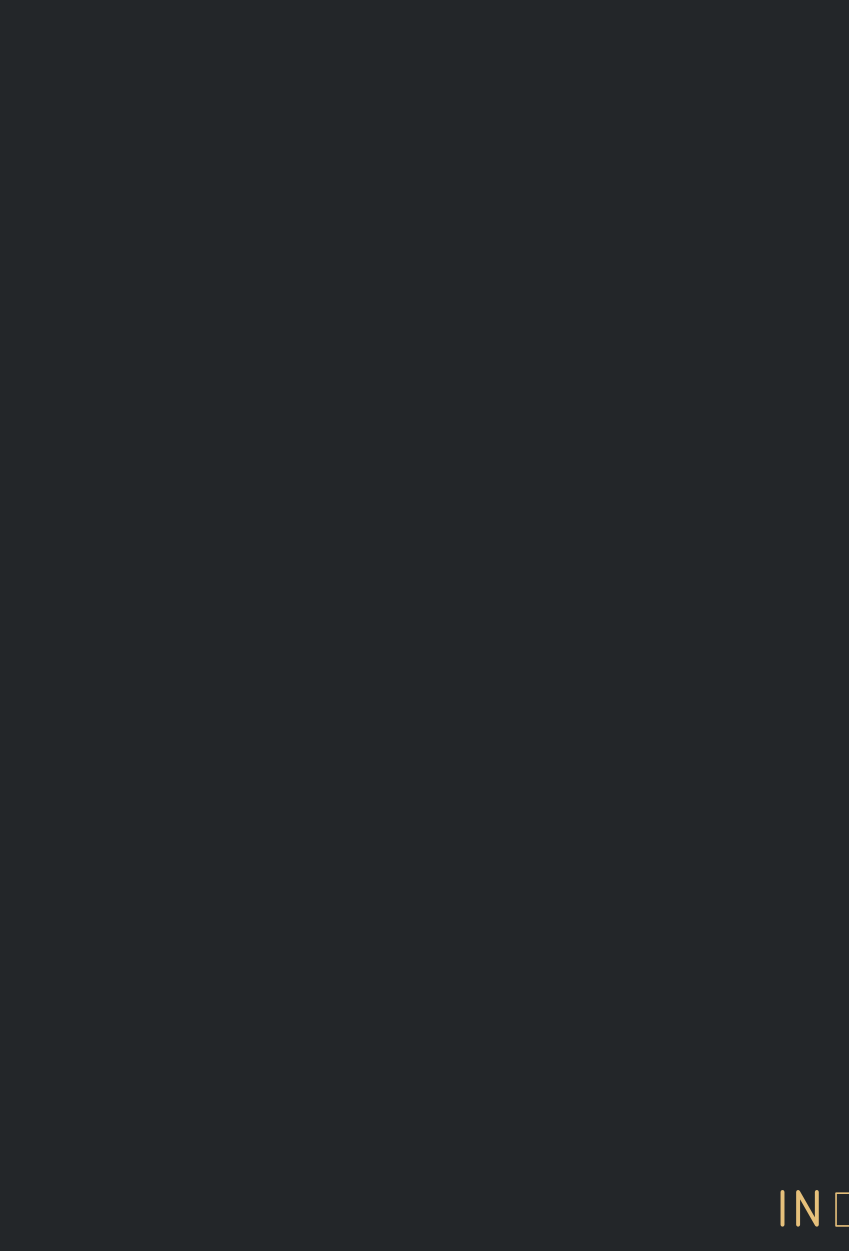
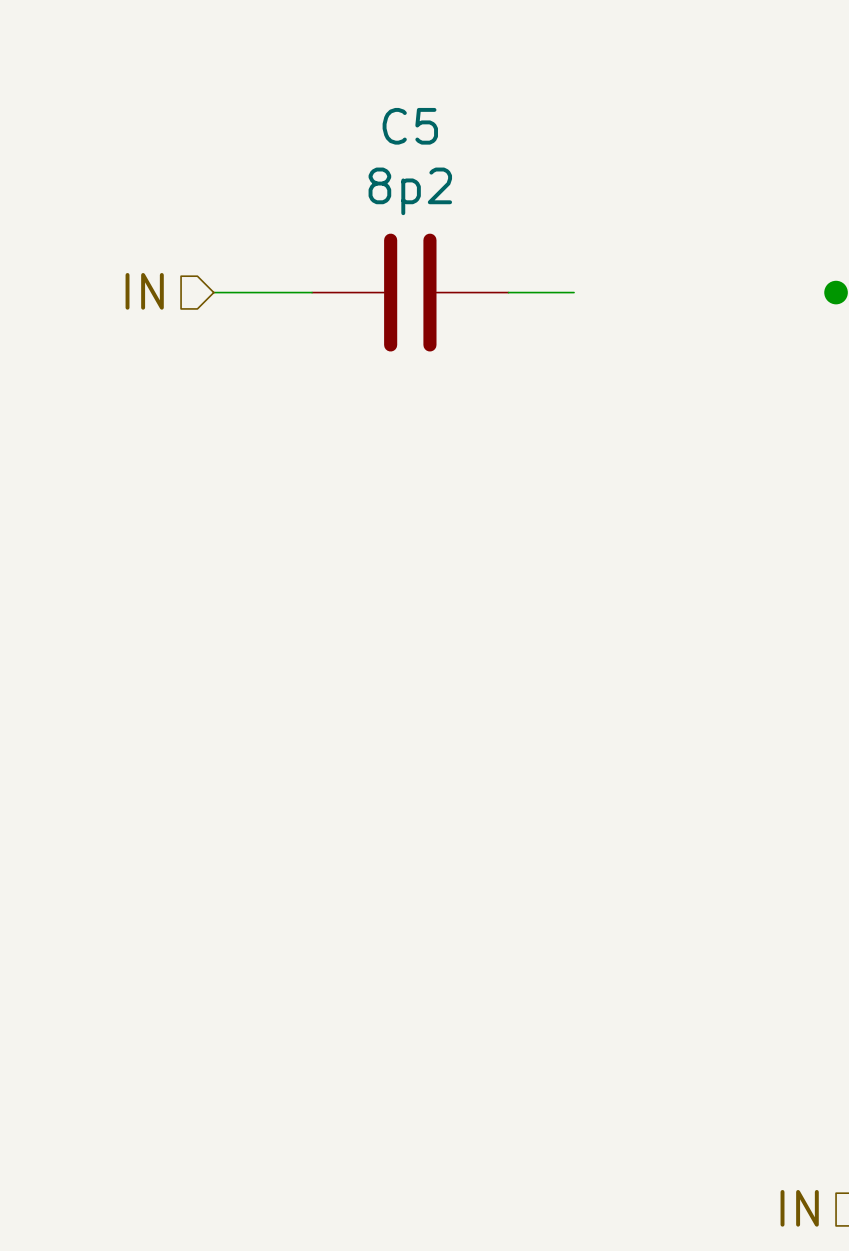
hierarchical label: none -> IN (144, 291)
wire: none -> (213, 292) (312, 292)
C5: none -> 8p2 (410, 292)
wire: none -> (508, 292) (574, 292)
junction: none -> (836, 292)

